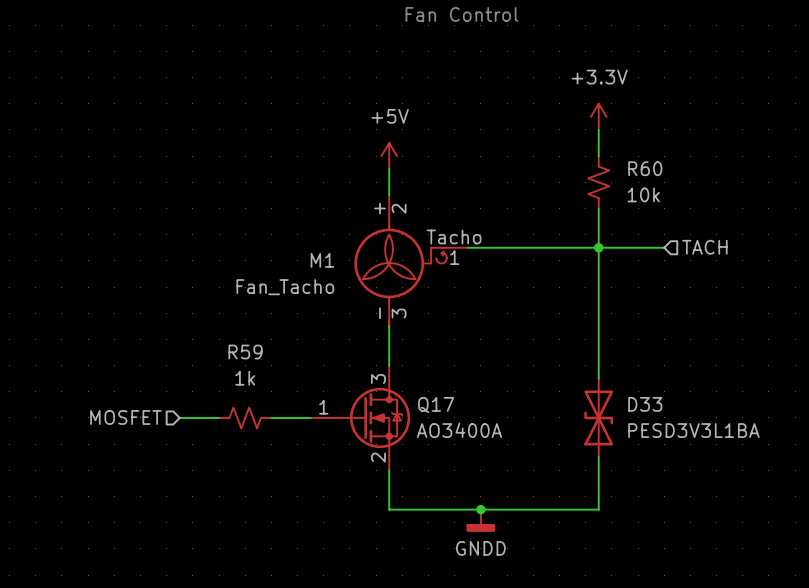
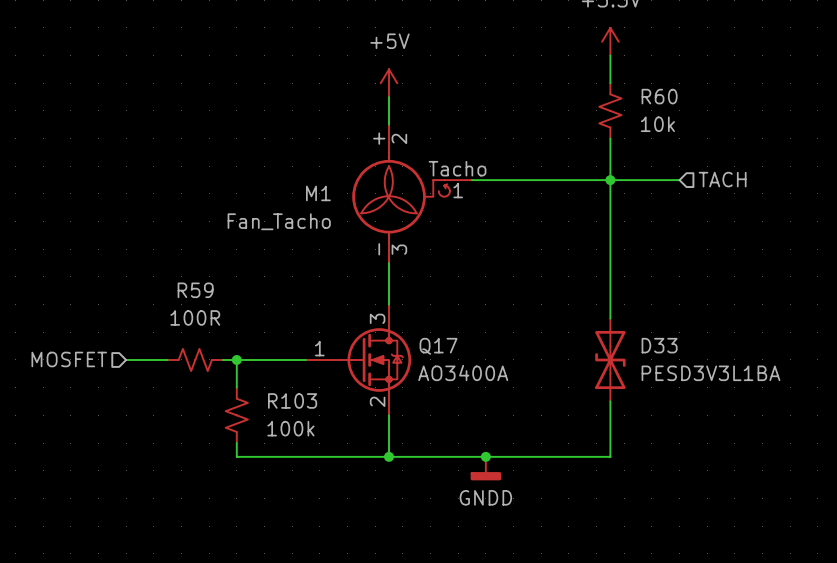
R59 value: 1k (245, 378) -> 100R (195, 317)
hierarchical label position: MOSFET (125, 417) -> MOSFET (69, 359)
wire: (179, 417) (219, 417) -> (167, 359) (126, 359)
wire: none -> (222, 359) (264, 359)
wire: none -> (236, 359) (236, 387)
R59 position: (245, 417) -> (195, 359)
junction: none -> (236, 359)
R103: none -> 100k (236, 415)
wire: none -> (236, 443) (236, 456) (389, 456)
junction: none -> (389, 456)

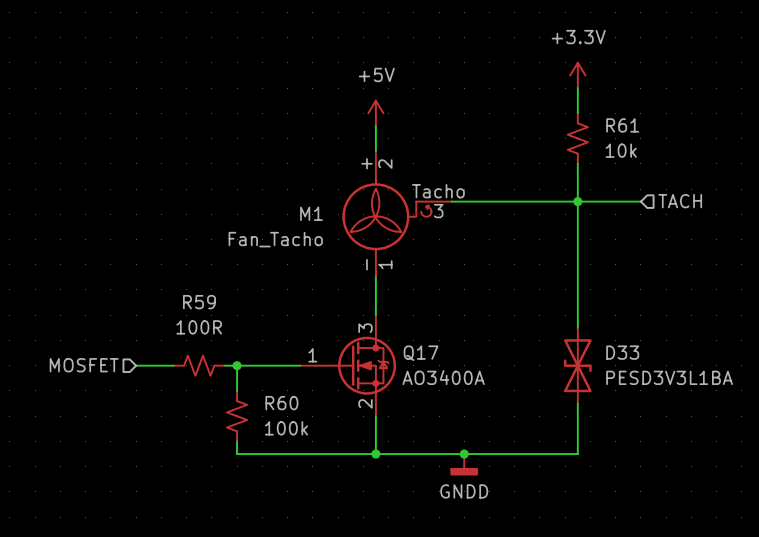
R60 name: R60 (659, 96) -> R61 (622, 125)
M1 pin number: 1 (458, 190) -> 3 (438, 211)
M1 pin number: 3 (399, 249) -> 1 (385, 264)
R103 name: R103 (292, 400) -> R60 (281, 403)

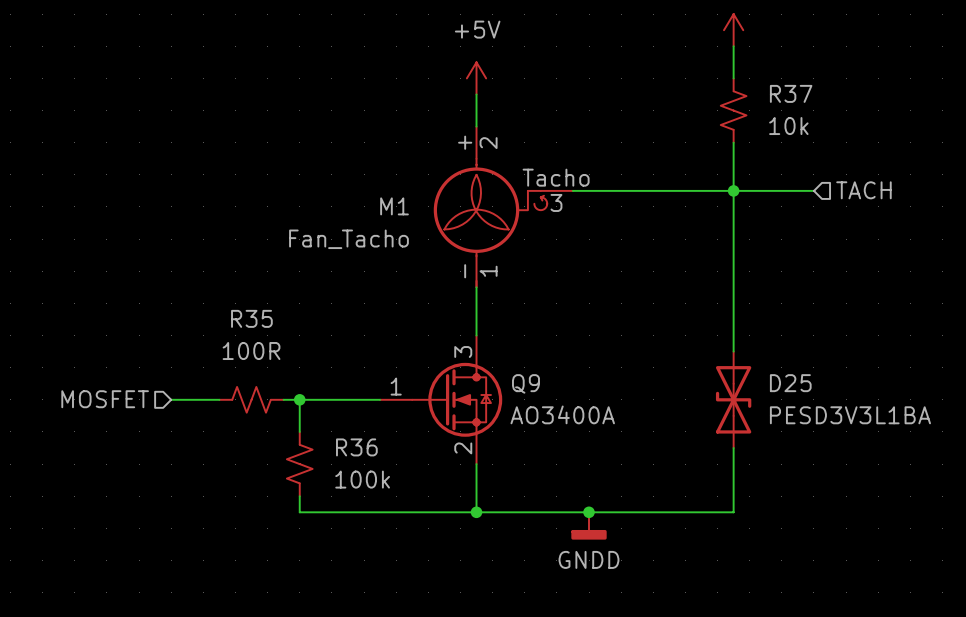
R61 name: R61 (622, 125) -> R37 (791, 93)
R59 name: R59 (199, 302) -> R35 (251, 318)
D33 name: D33 (622, 352) -> D25 (790, 383)
Q17: AO3400A (348, 365) -> none
Q9: none -> AO3400A (441, 399)
R60 name: R60 (281, 403) -> R36 (356, 447)

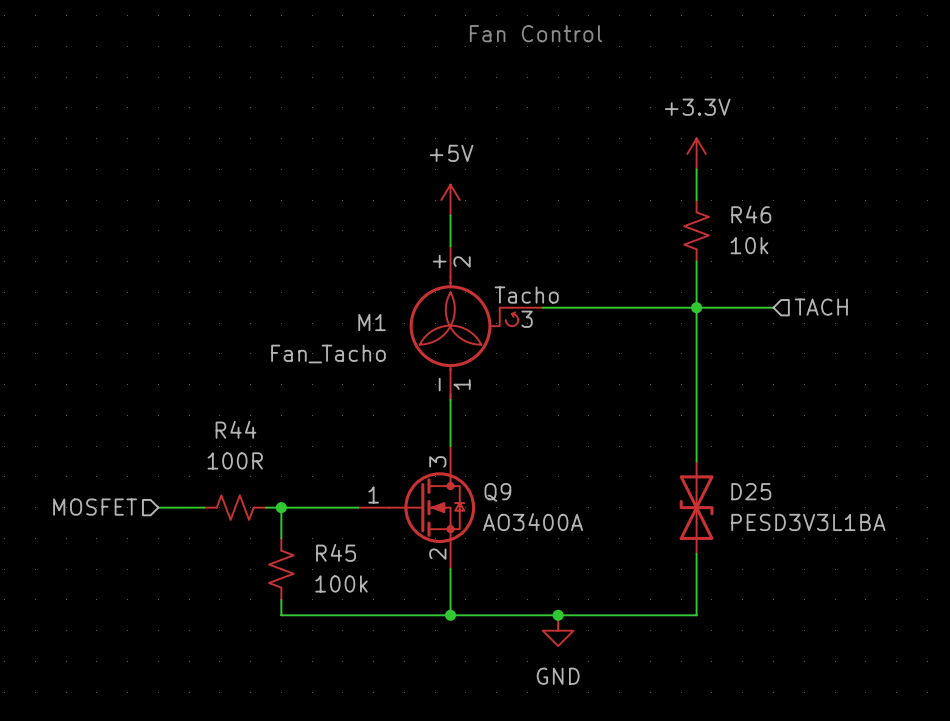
R37 name: R37 (791, 93) -> R46 (751, 214)
R35 name: R35 (251, 318) -> R44 (235, 429)
R36 name: R36 (356, 447) -> R45 (336, 552)
power symbol: GNDD (589, 525) -> GND (558, 630)

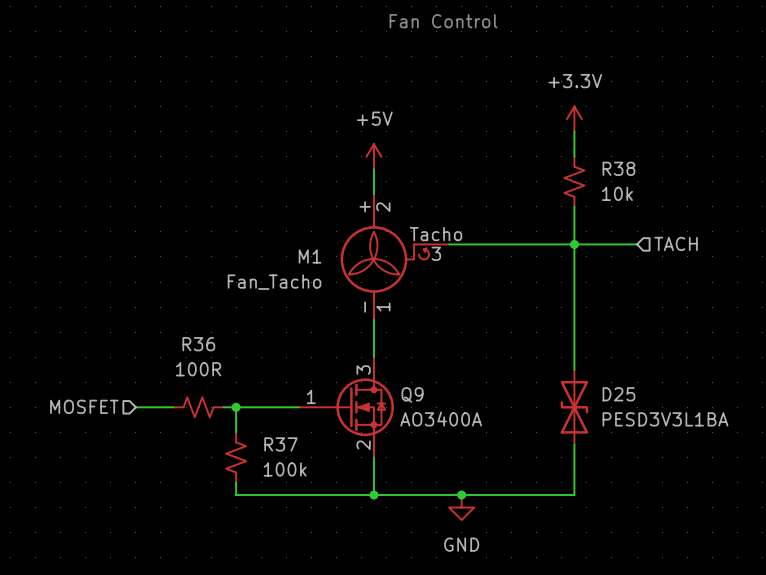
R46 name: R46 (751, 214) -> R38 (618, 168)
R44 name: R44 (235, 429) -> R36 (198, 344)
R45 name: R45 (336, 552) -> R37 (280, 444)

